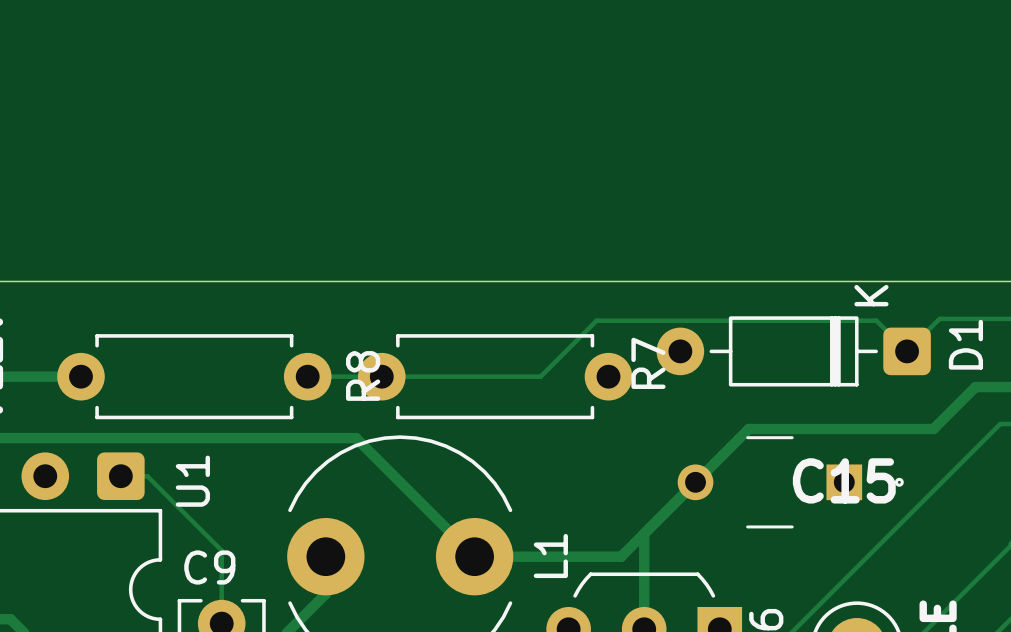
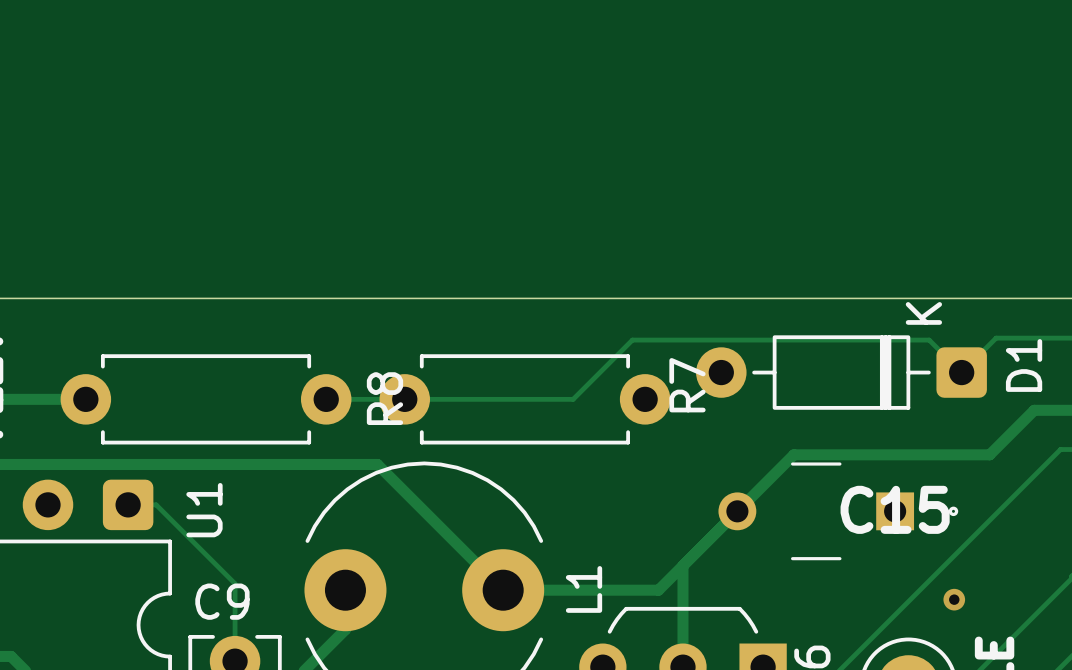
via: none -> (954, 599)

